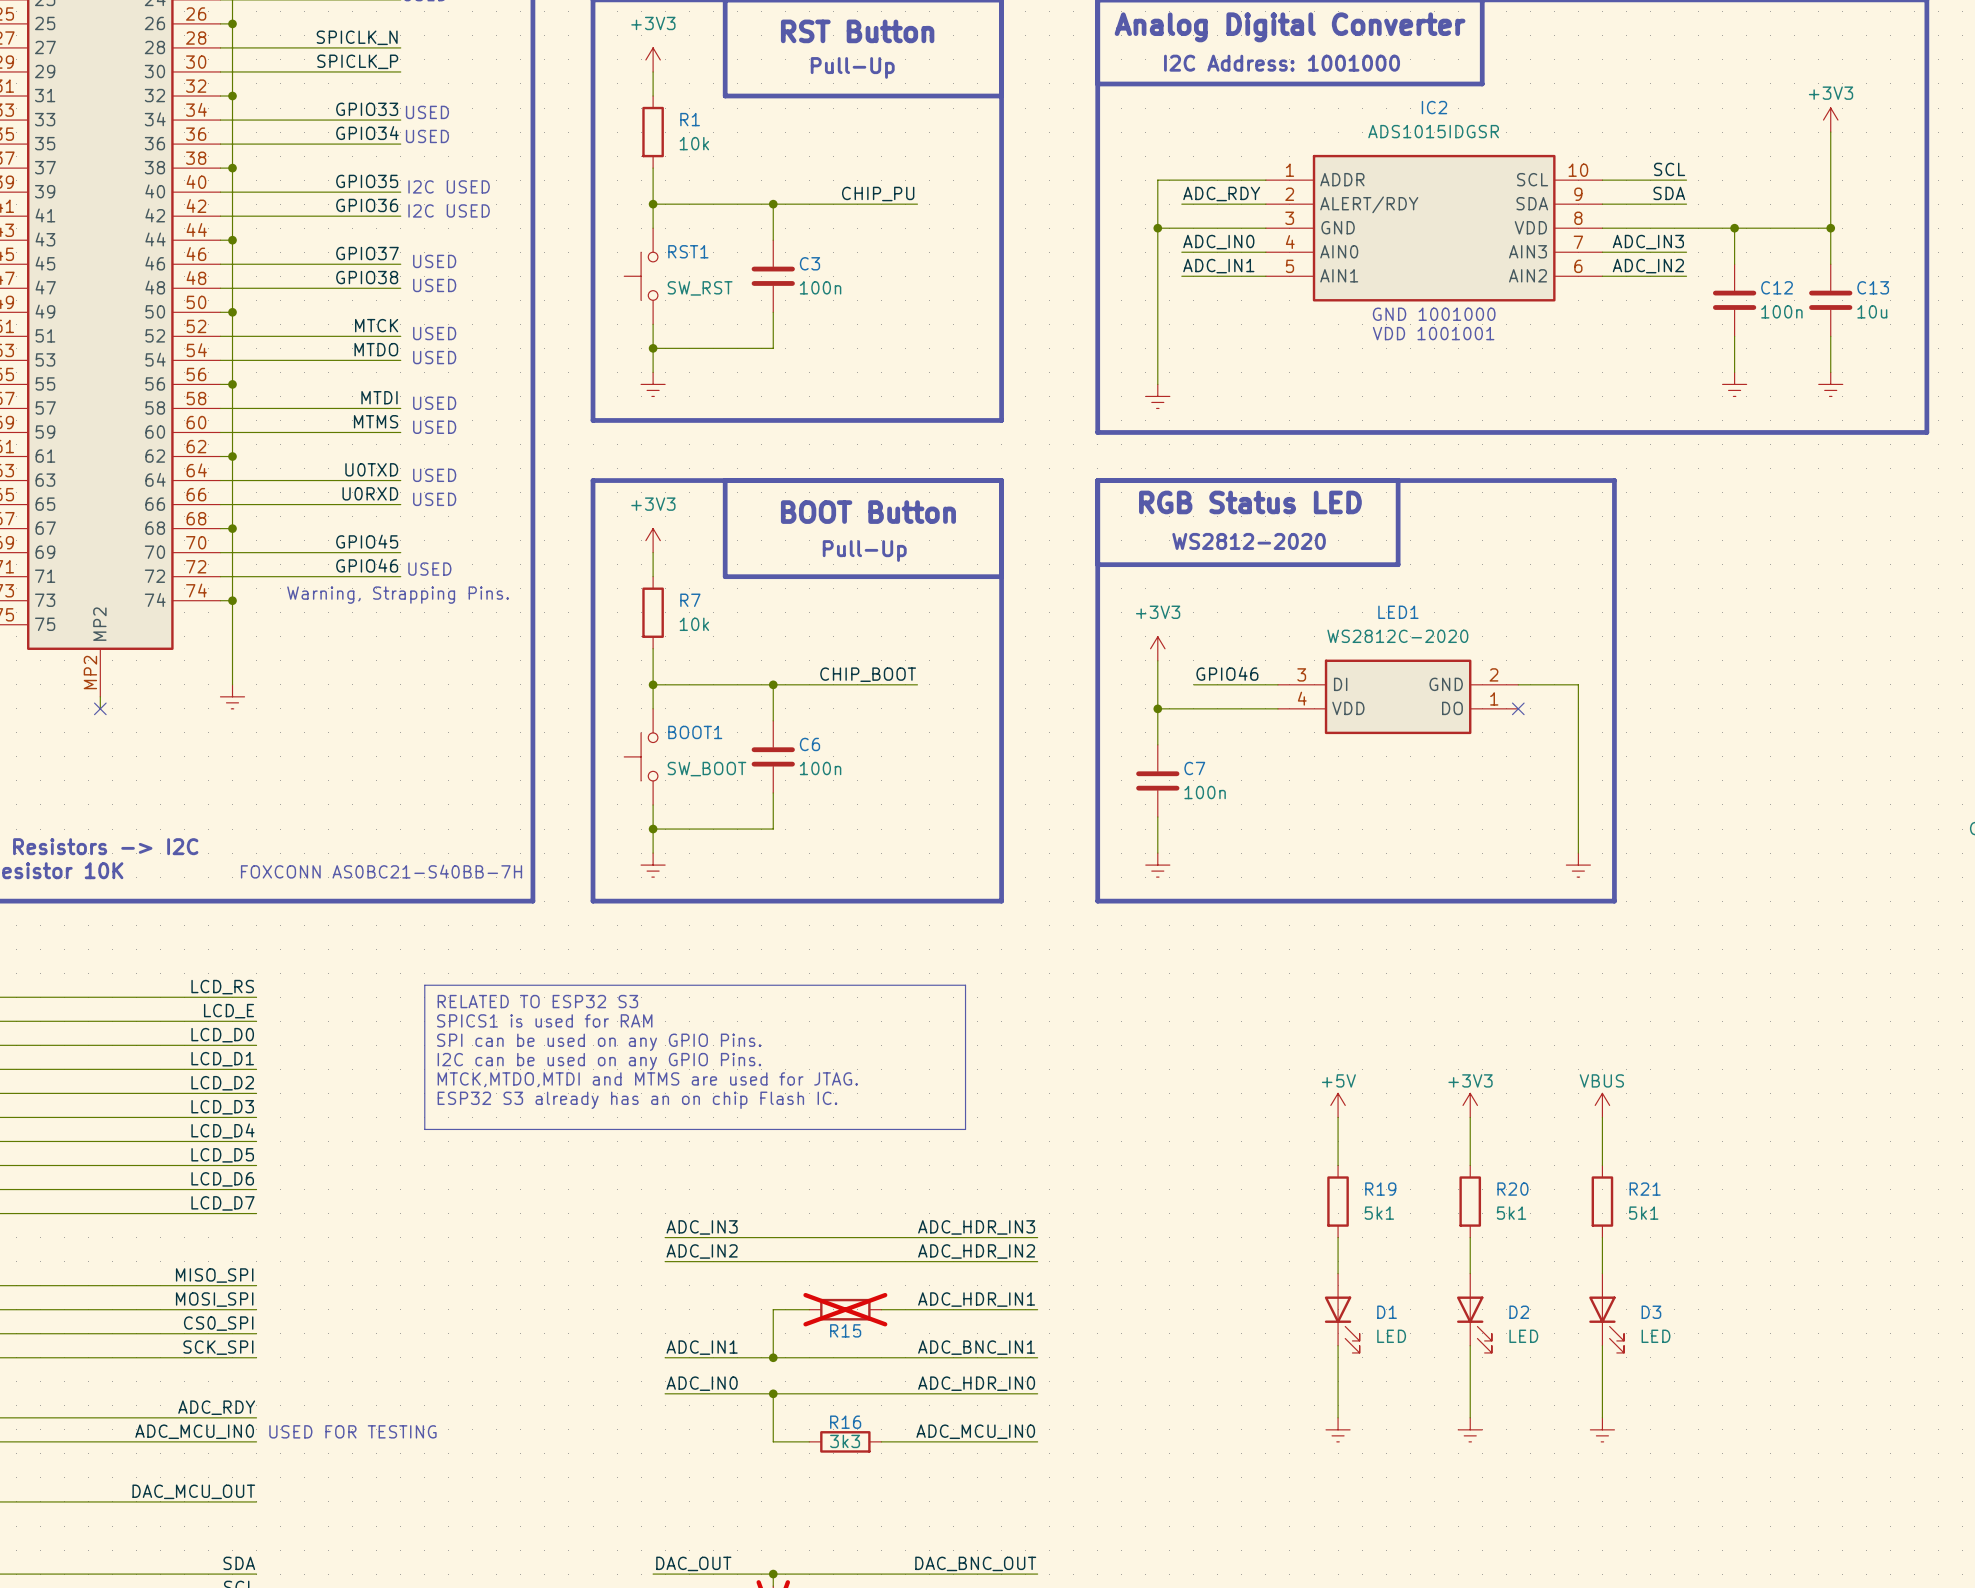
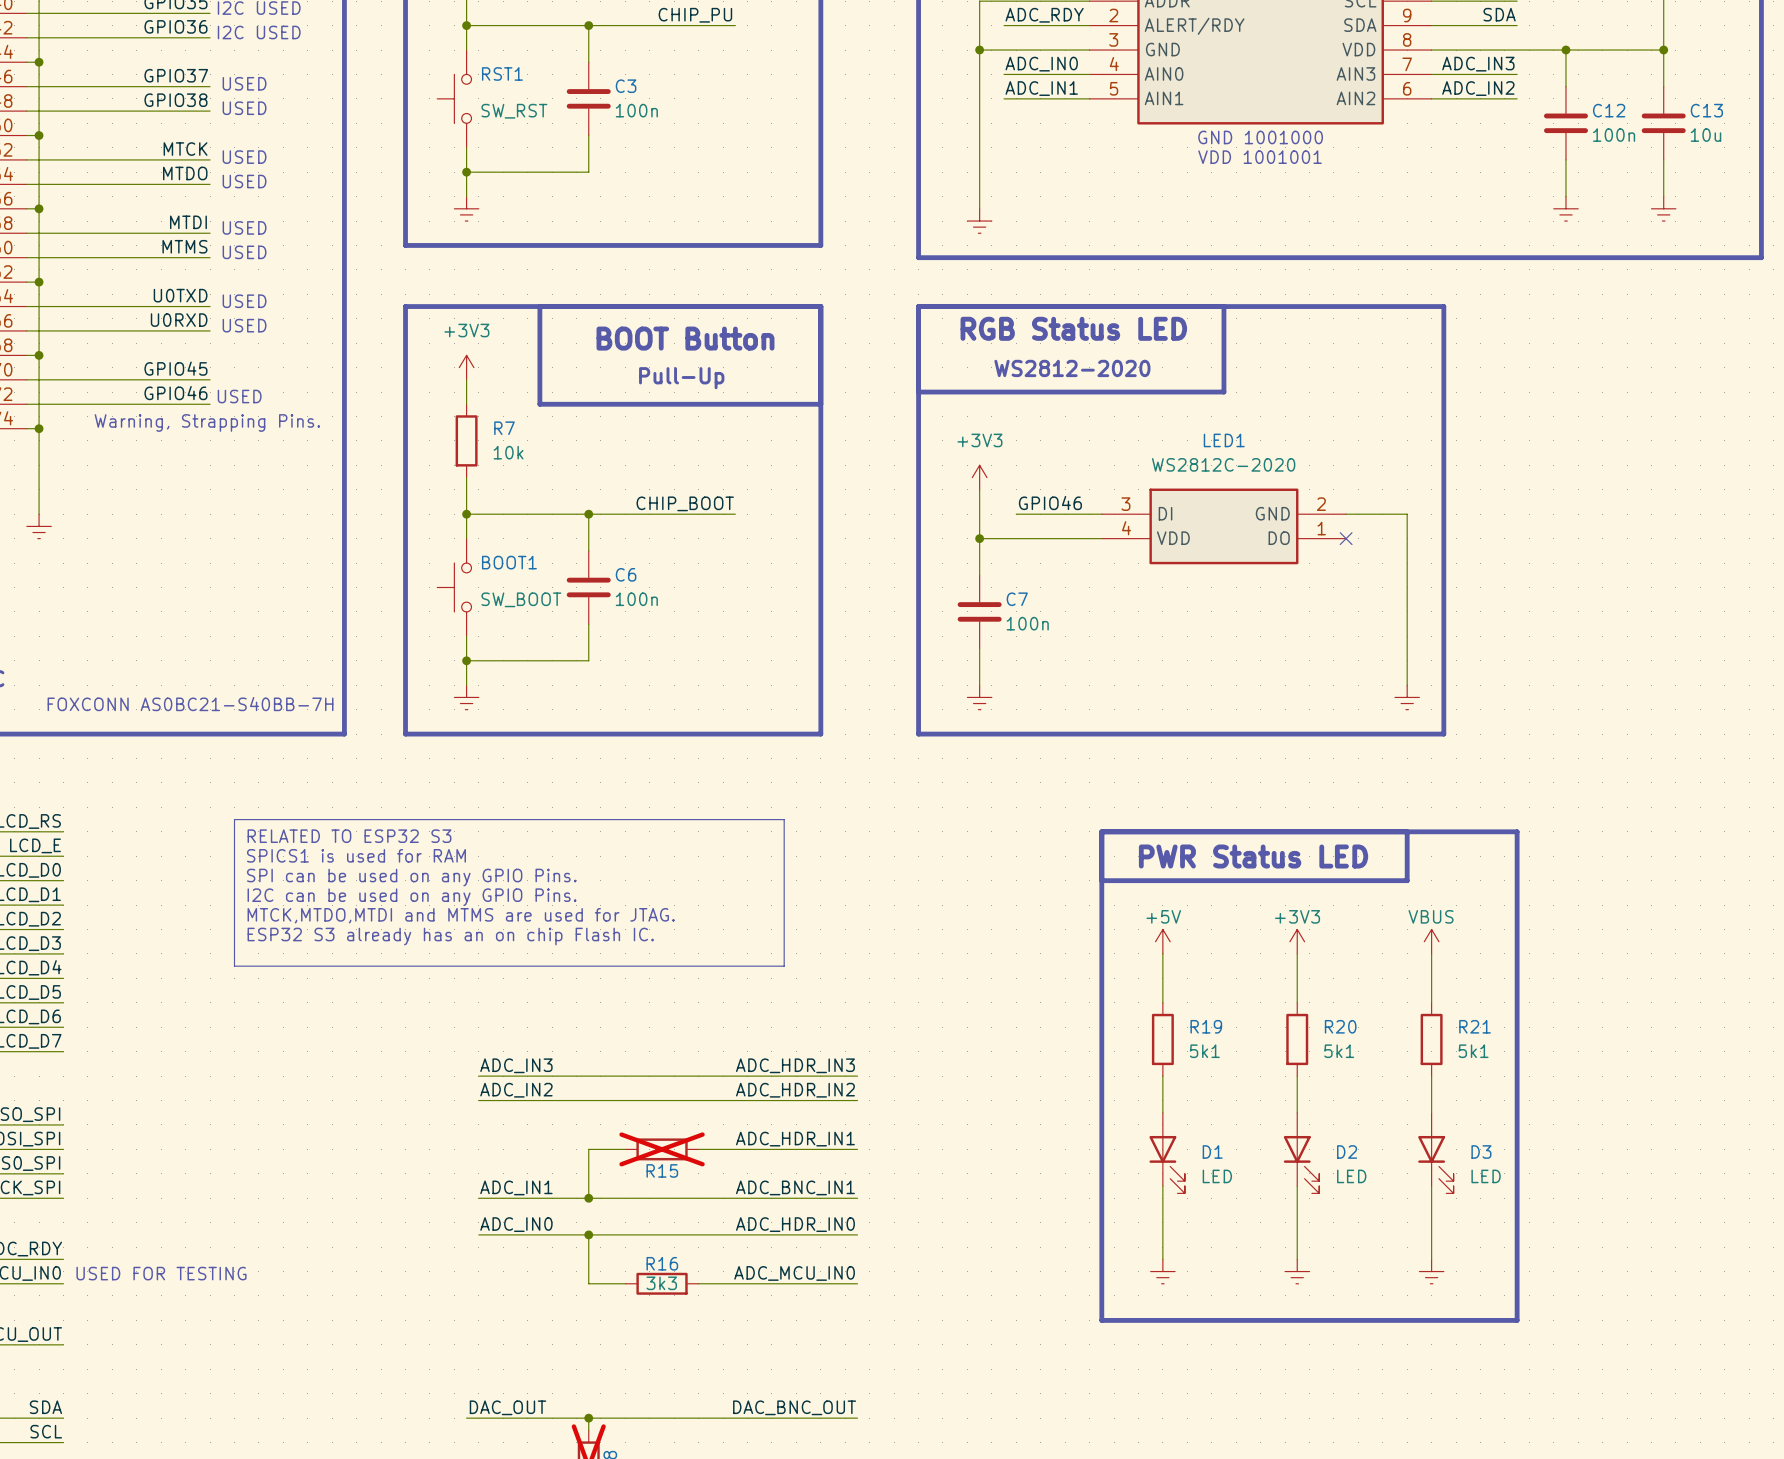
line: none -> (1101, 831) (1517, 831) (1517, 1320) (1101, 1320) (1101, 831)
line: none -> (1407, 831) (1407, 880) (1101, 880)
text: none -> PWR Status LED (1253, 856)

